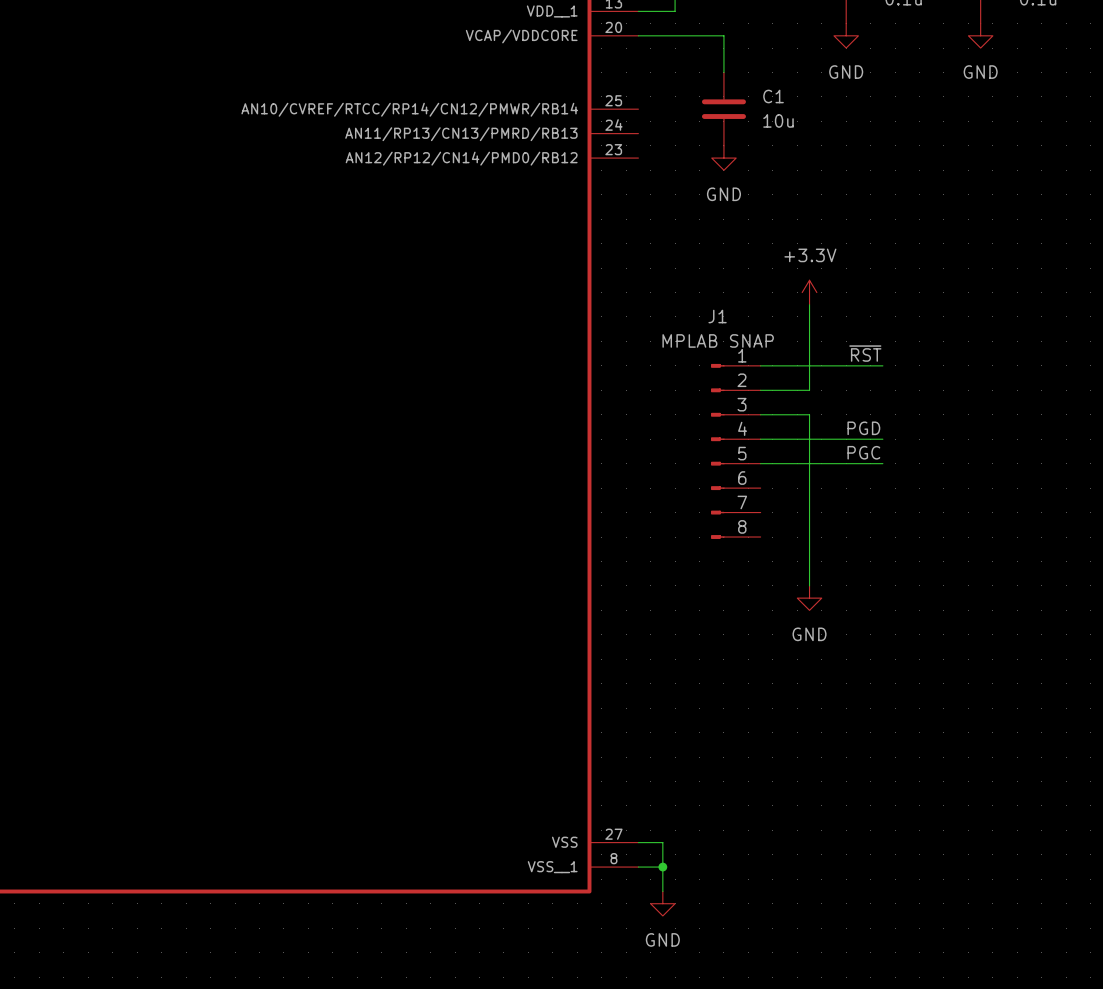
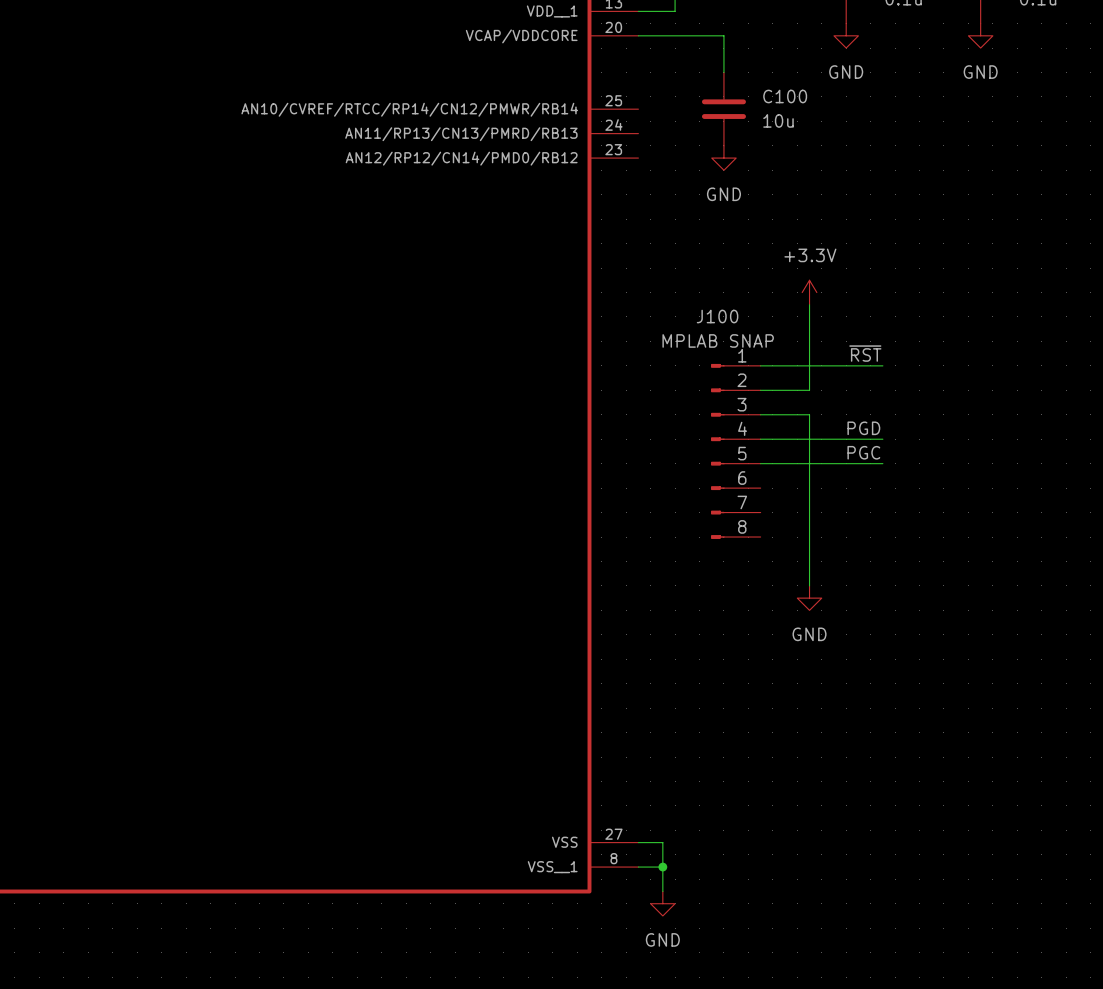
C1 name: C1 (773, 96) -> C100 (785, 96)
J1 name: J1 (717, 316) -> J100 (717, 316)

